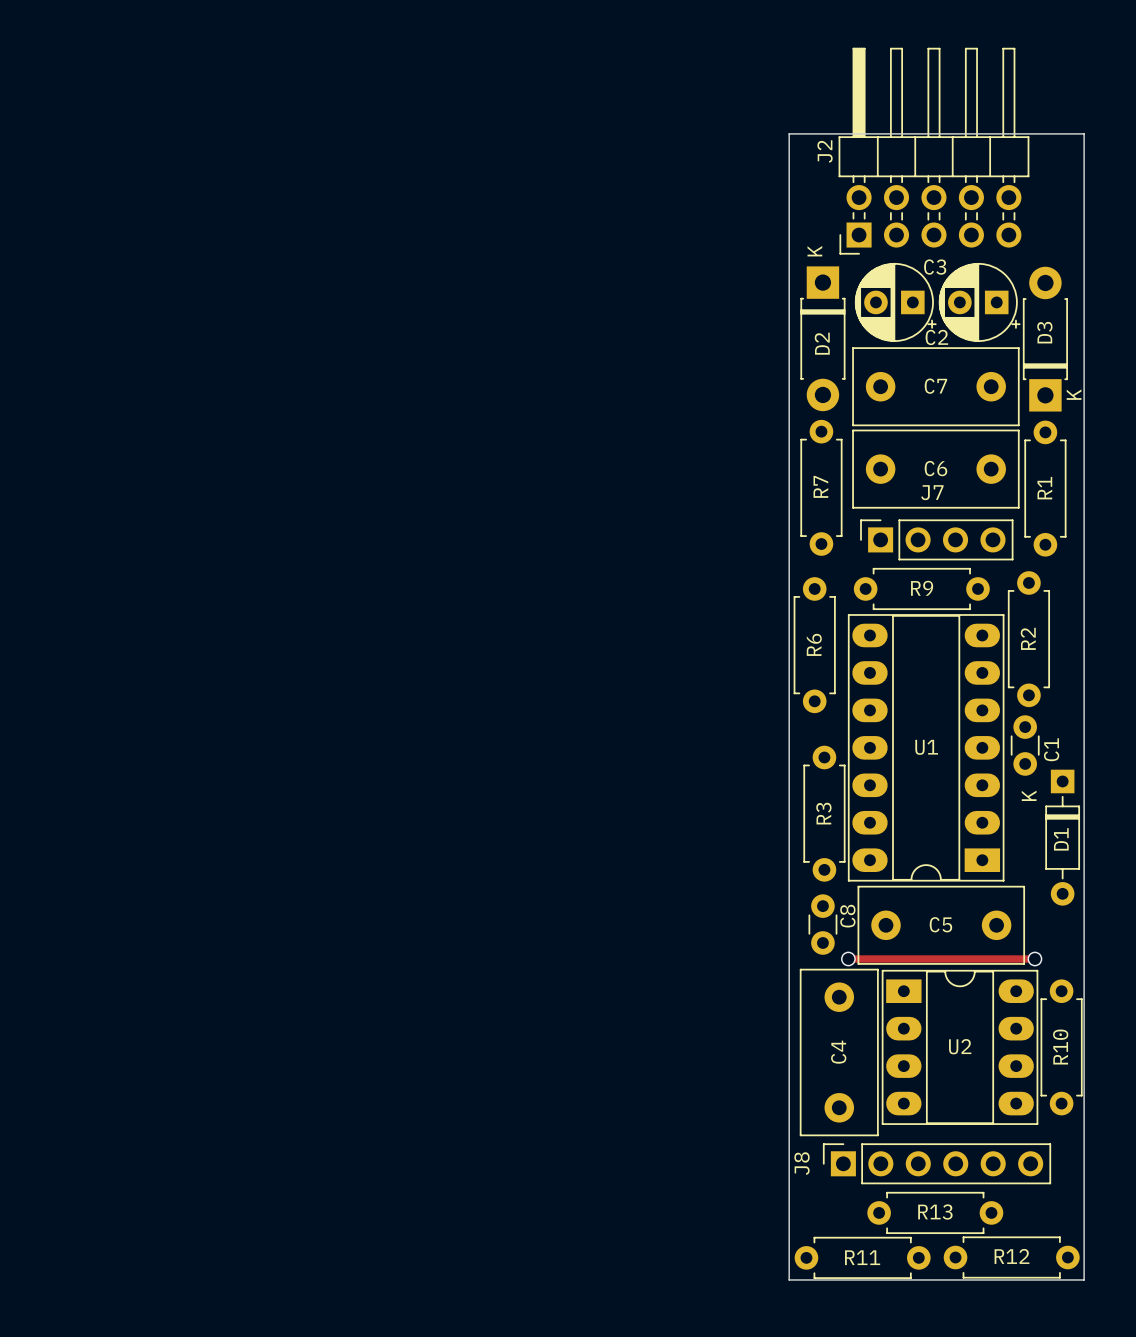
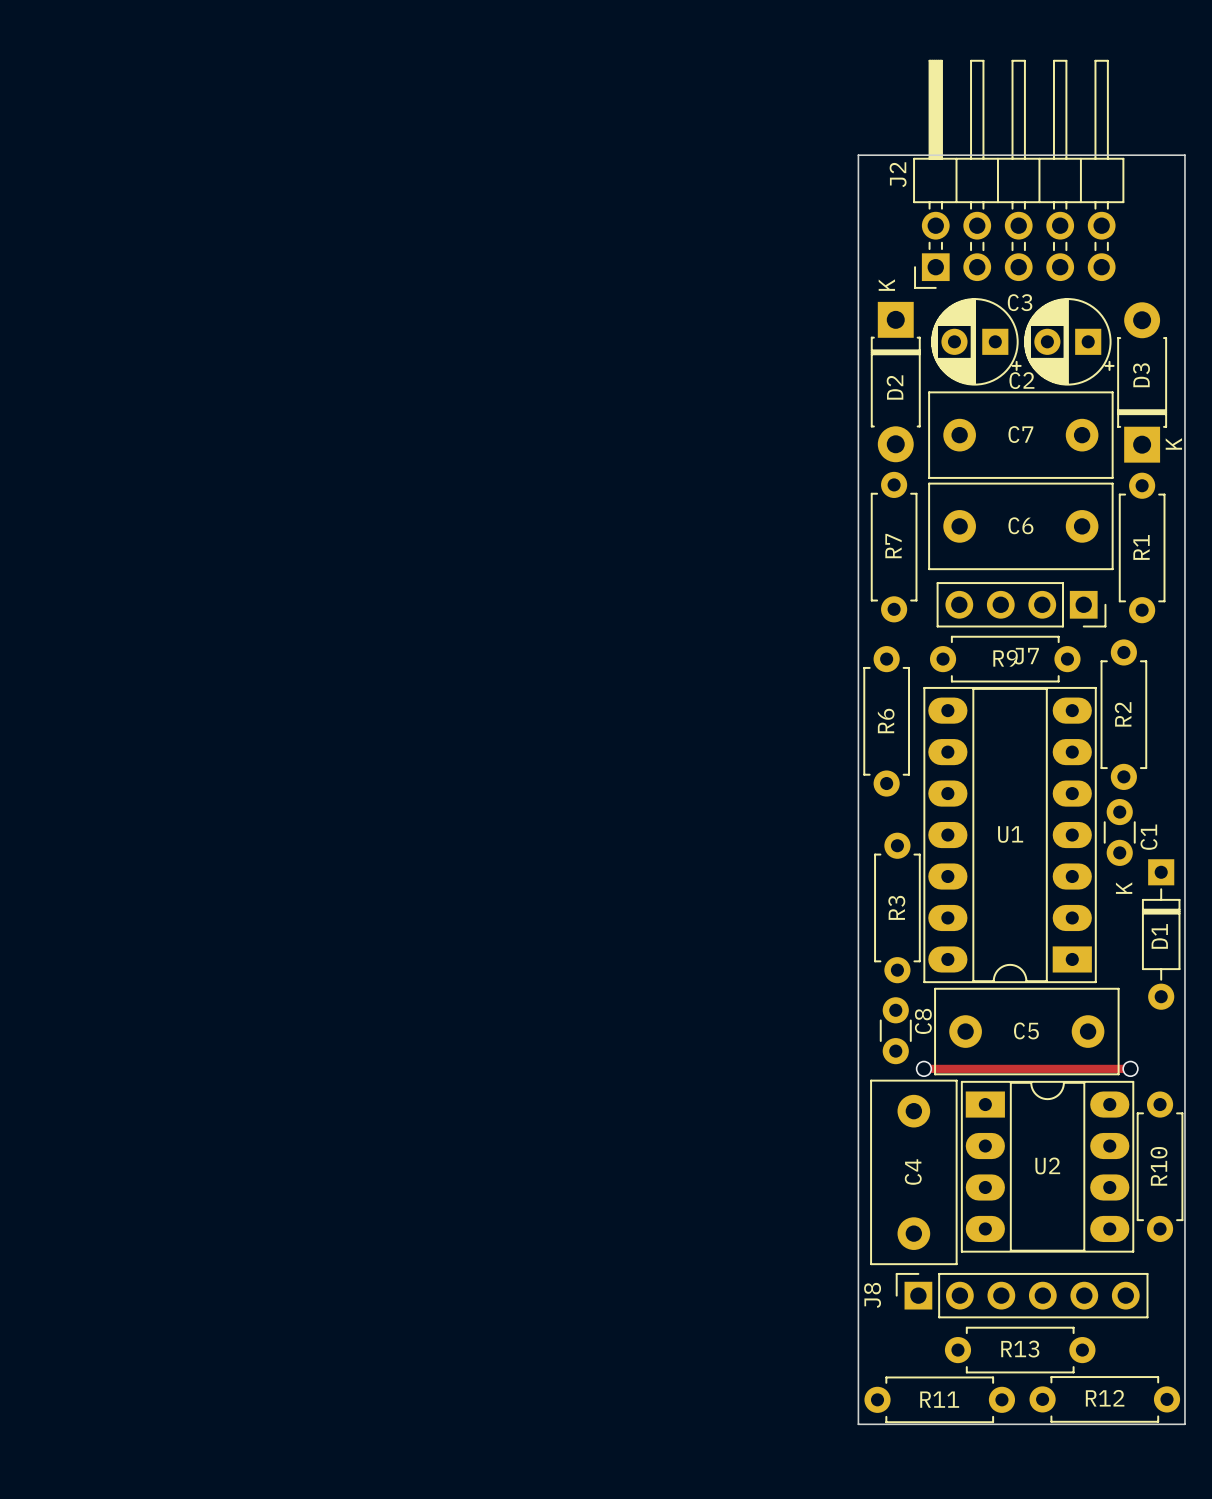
J7 rotation: 0° (936, 539) -> 180° (1021, 604)

